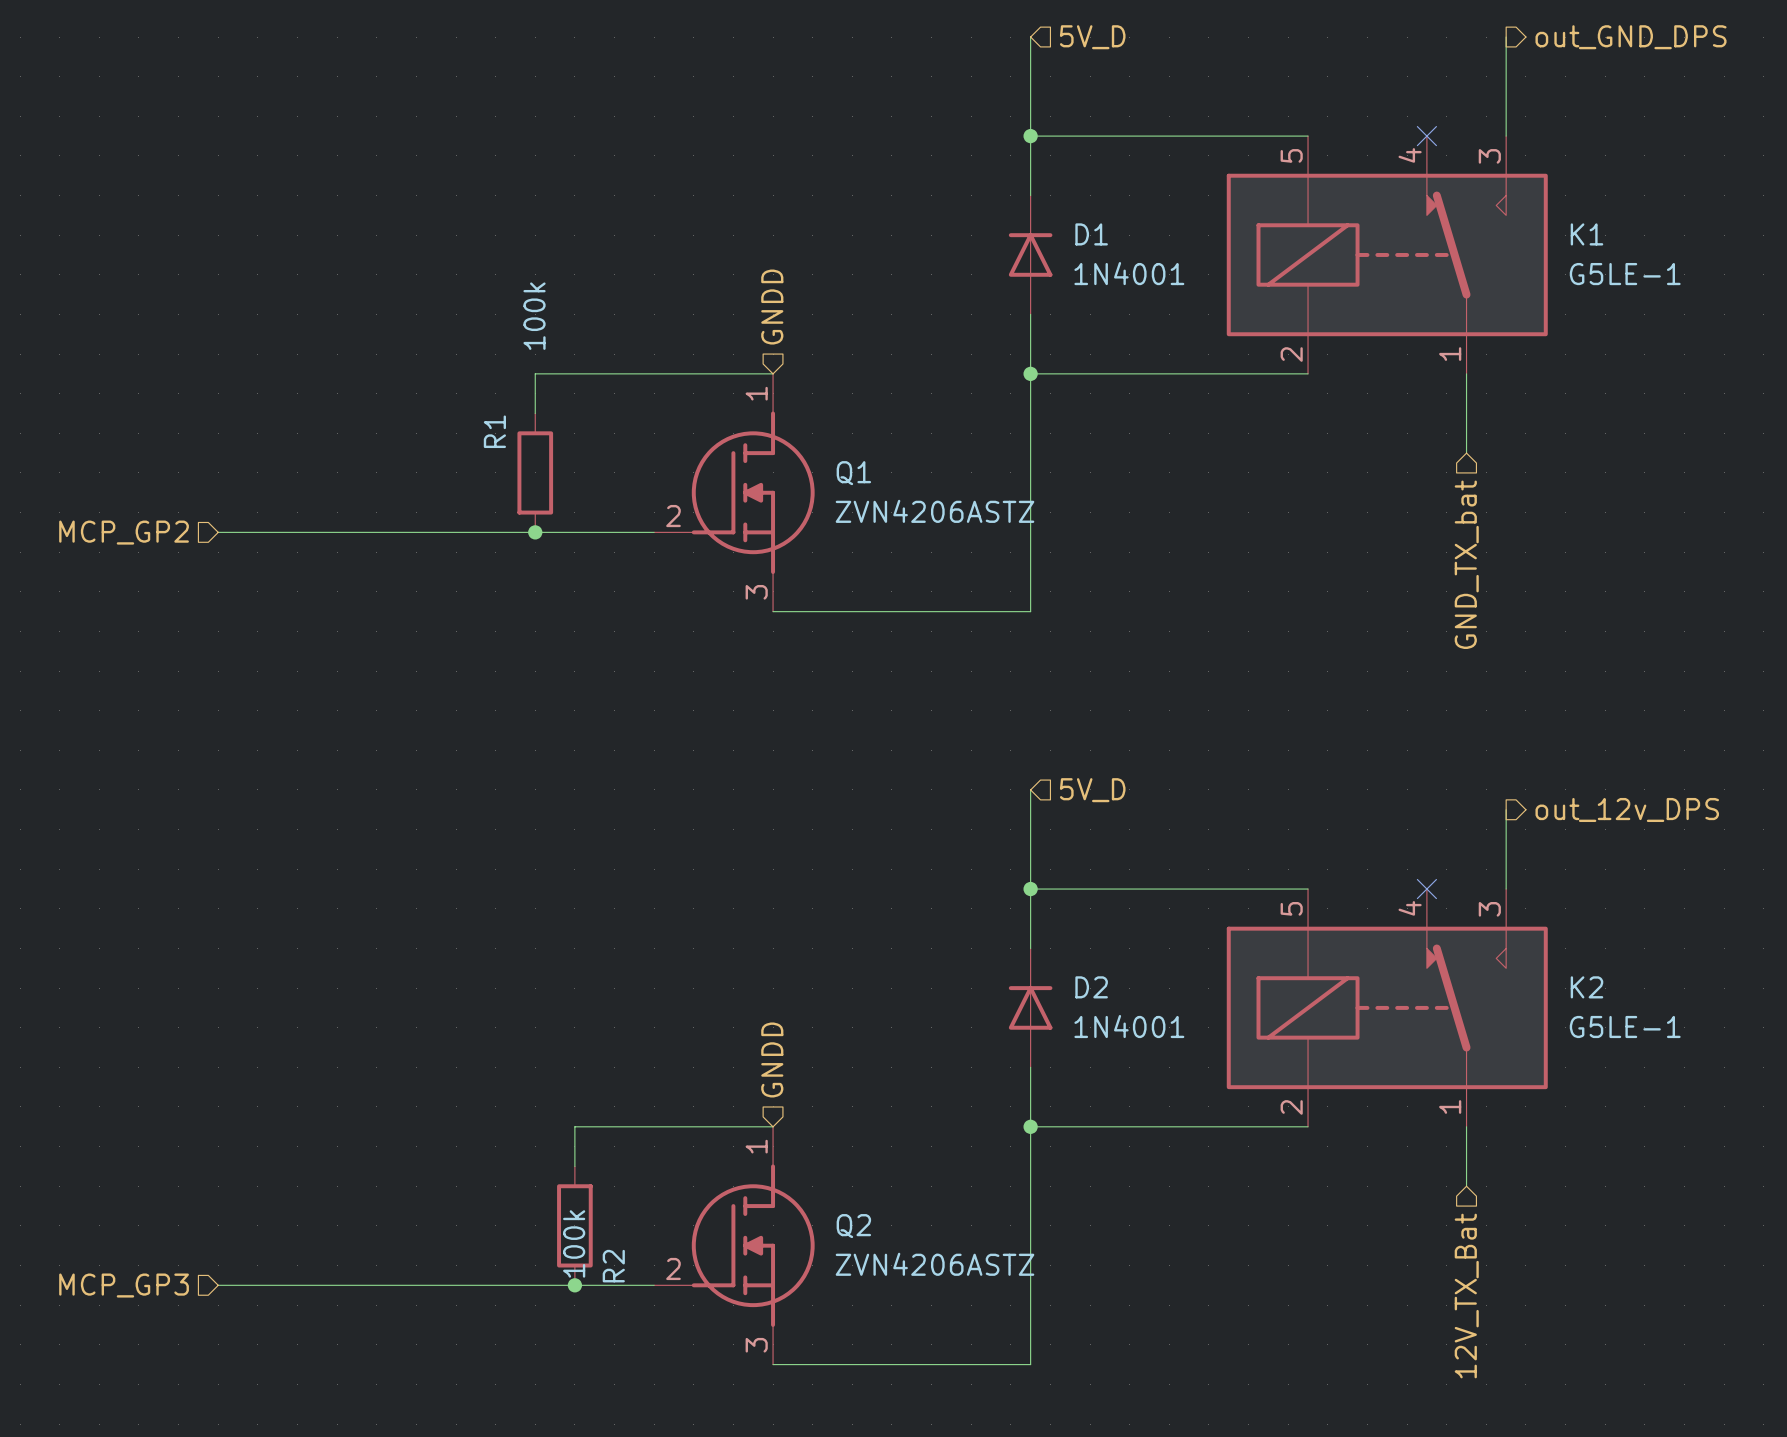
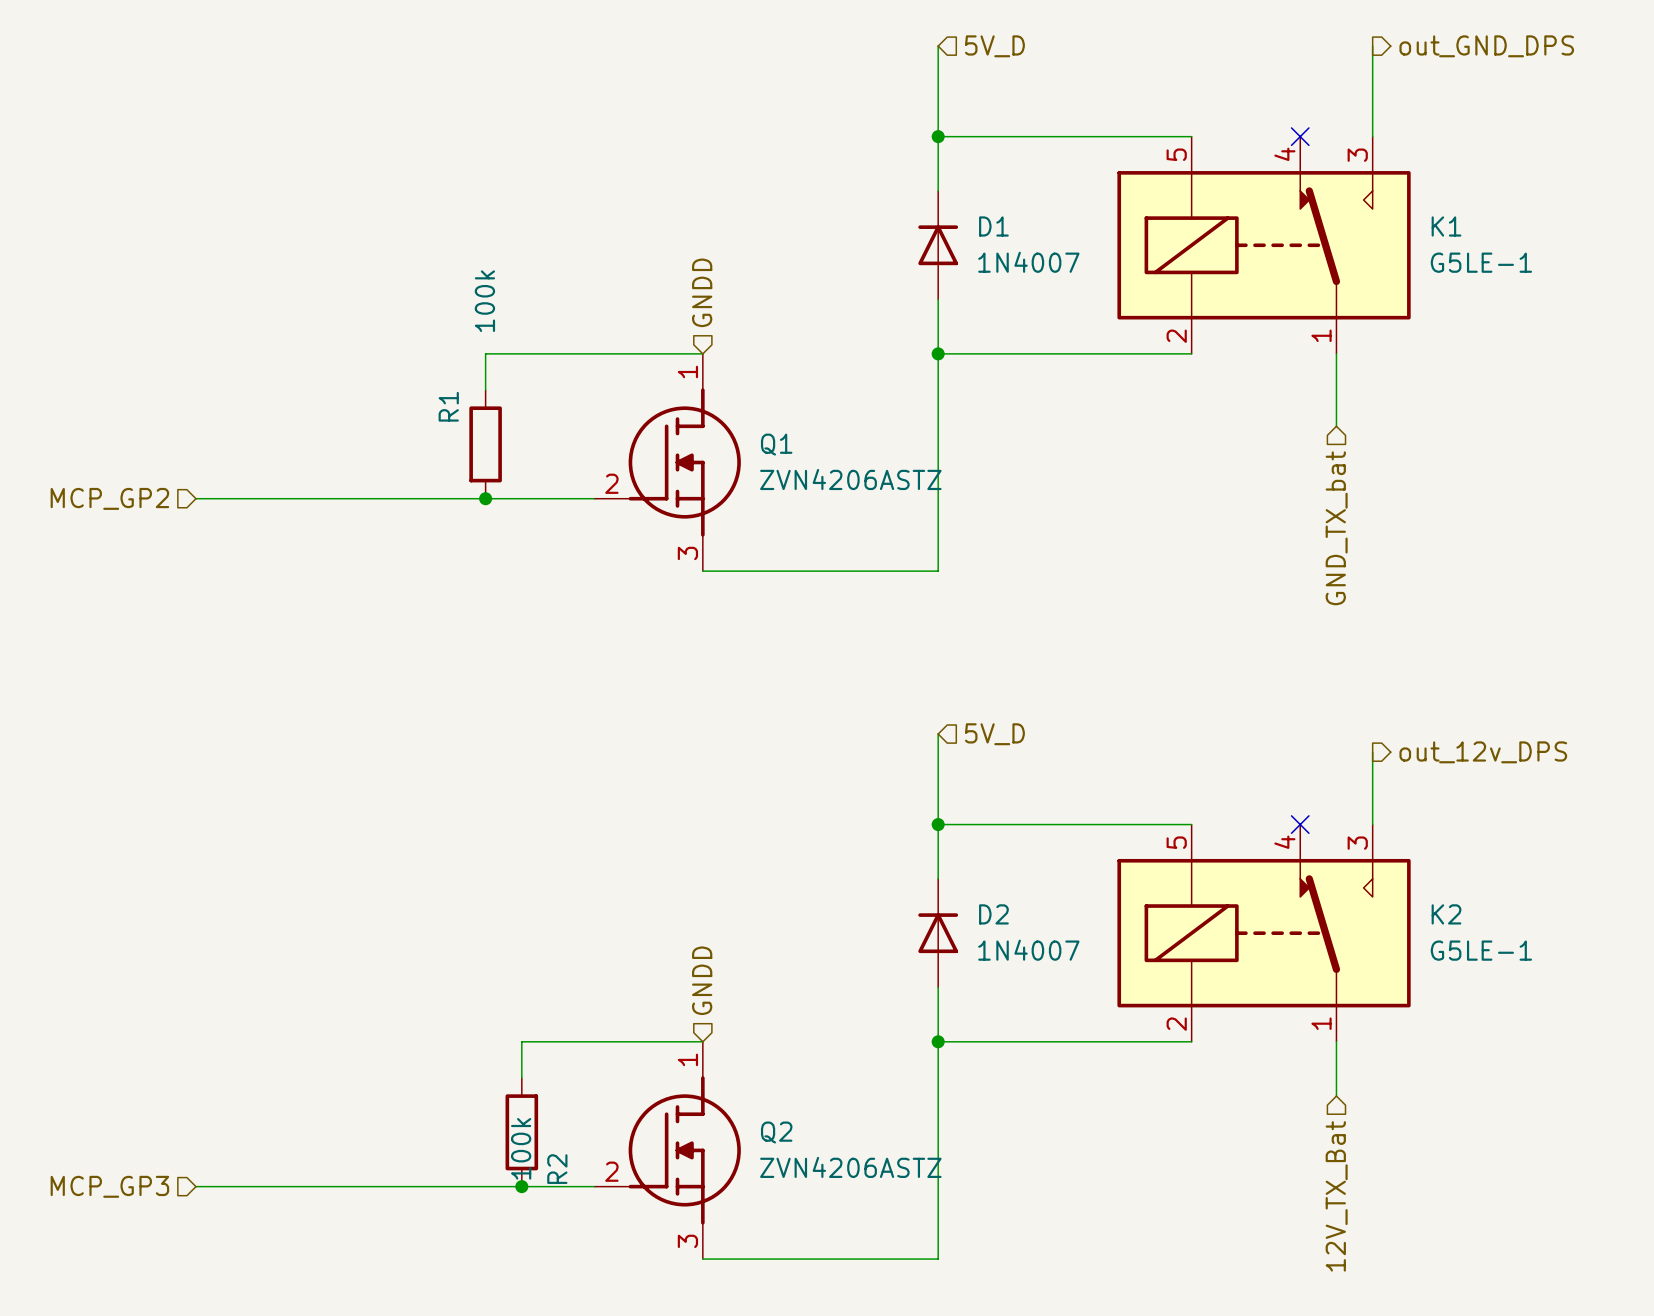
D1 value: 1N4001 (1129, 273) -> 1N4007 (1028, 262)
D2 value: 1N4001 (1129, 1026) -> 1N4007 (1028, 950)

